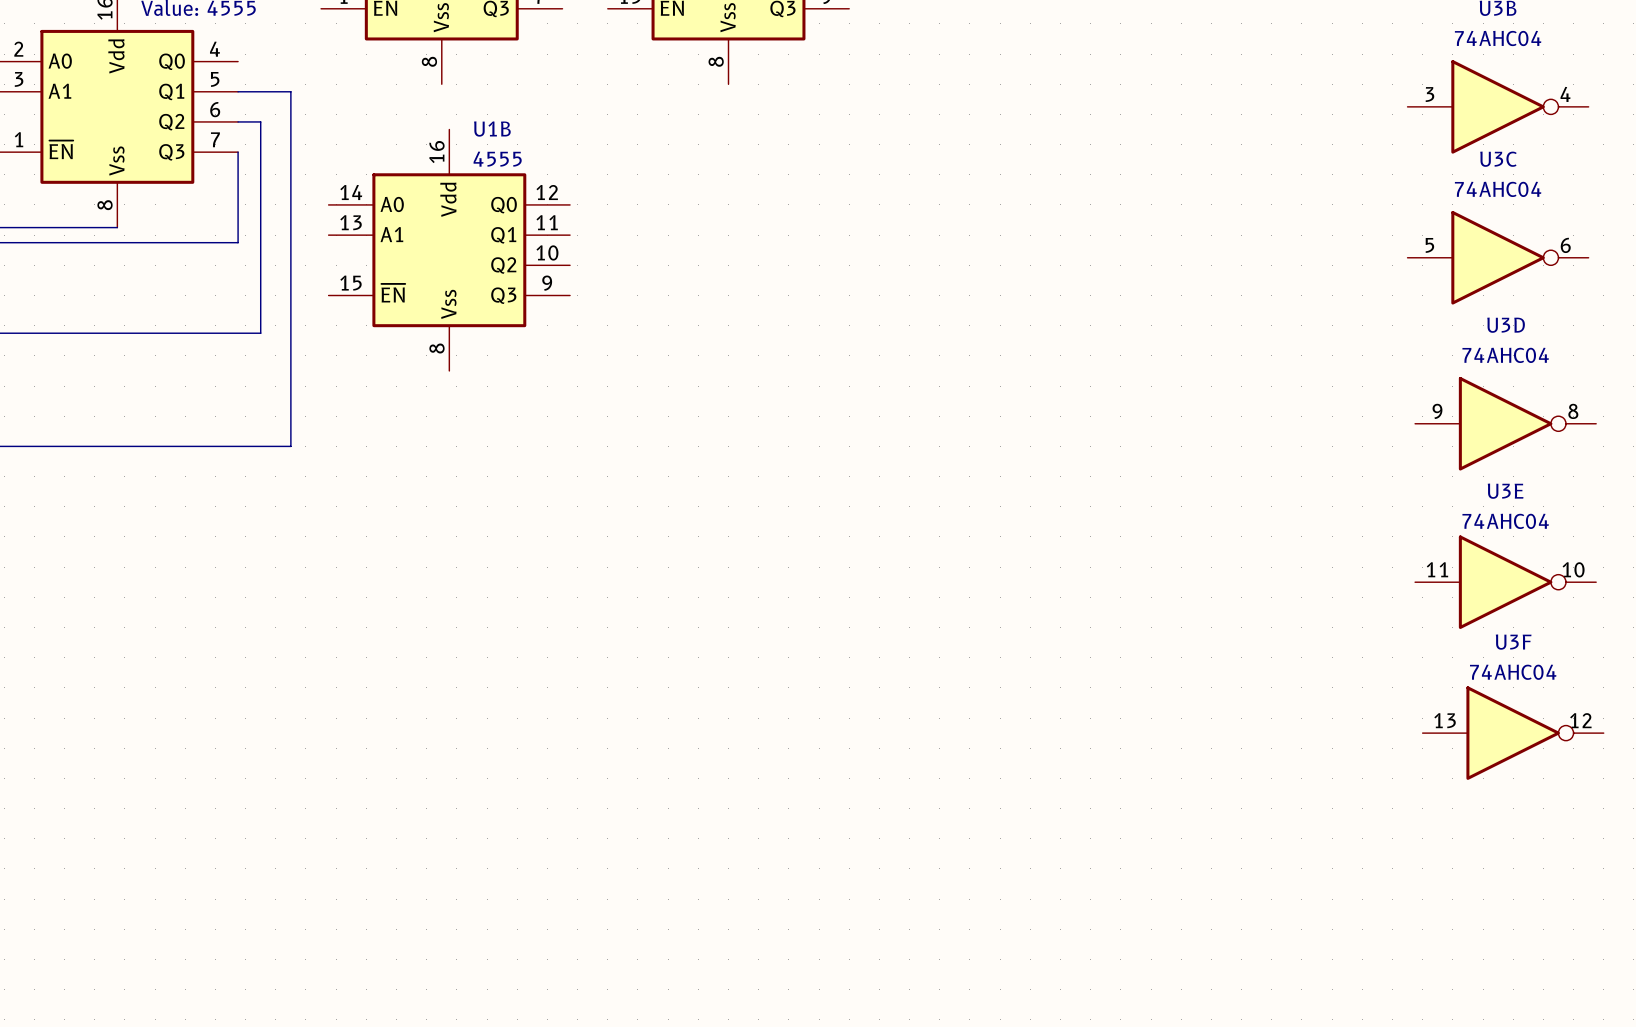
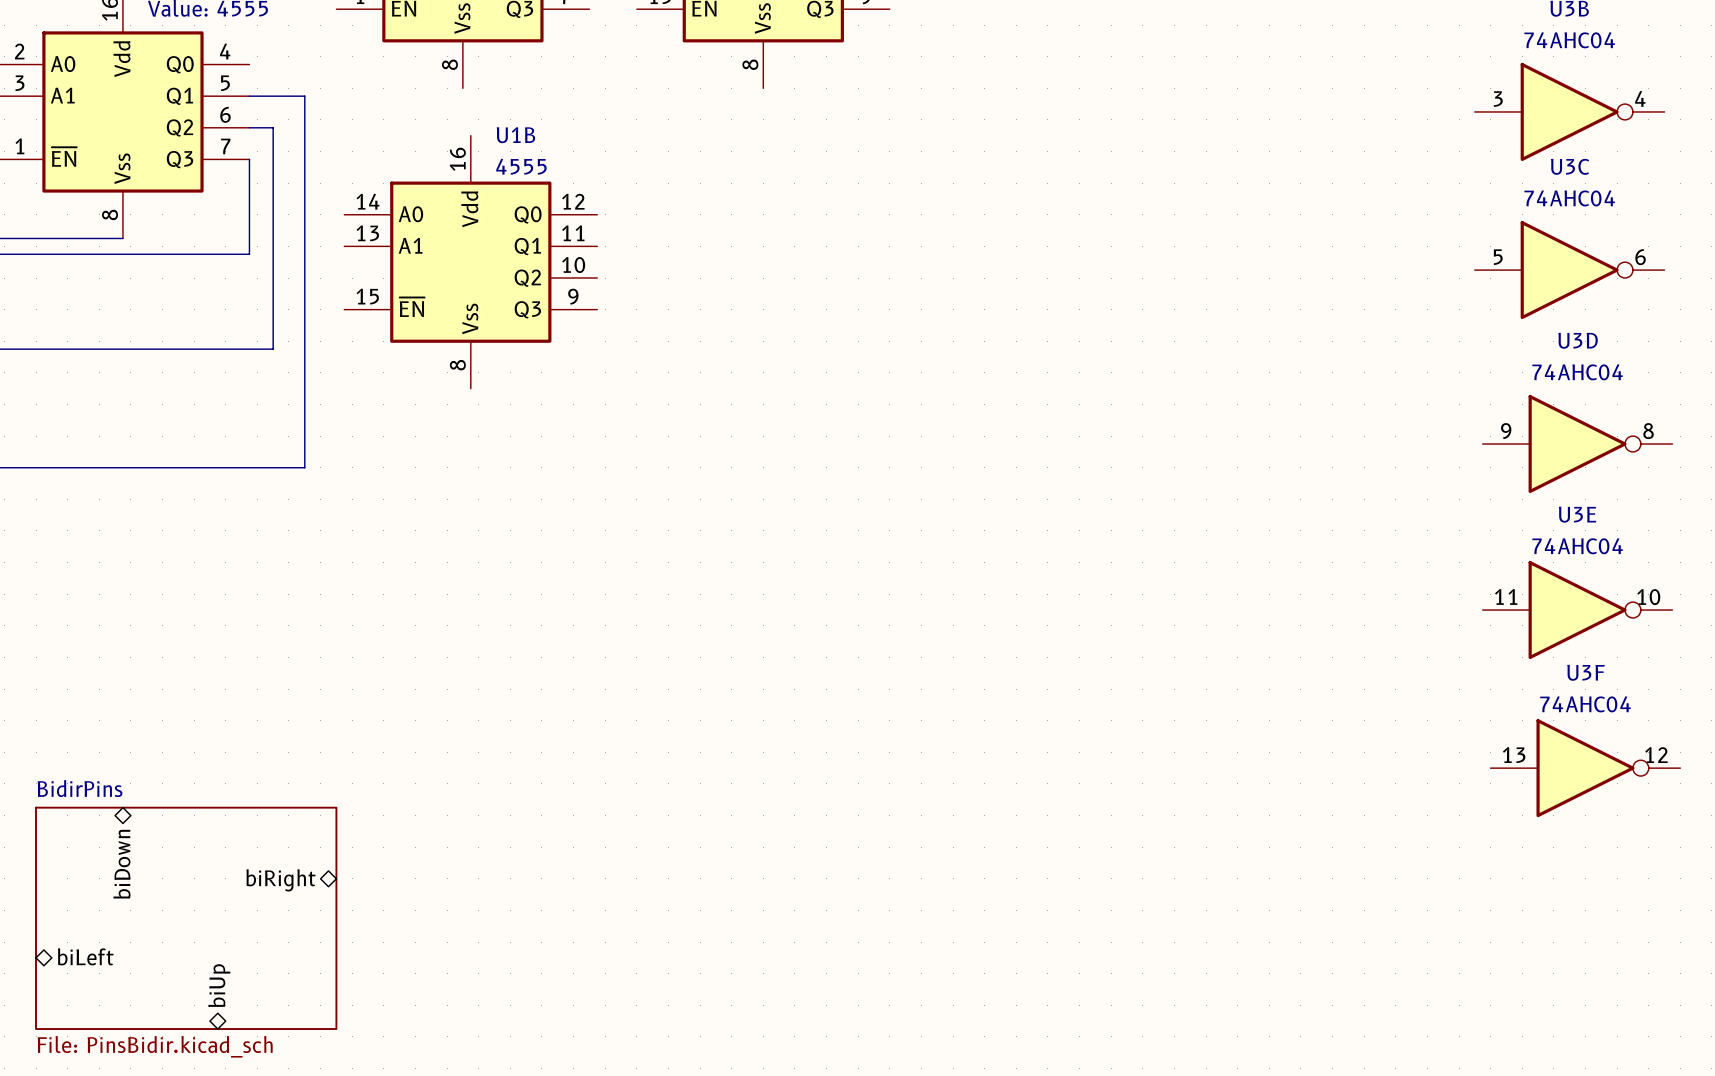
sheet pin: none -> biDown (121, 864)
sheet pin: none -> biRight (280, 880)
sheet BidirPins: none -> File: PinsBidir.kicad_sch (186, 918)
sheet pin: none -> biLeft (85, 956)
sheet pin: none -> biUp (219, 985)

